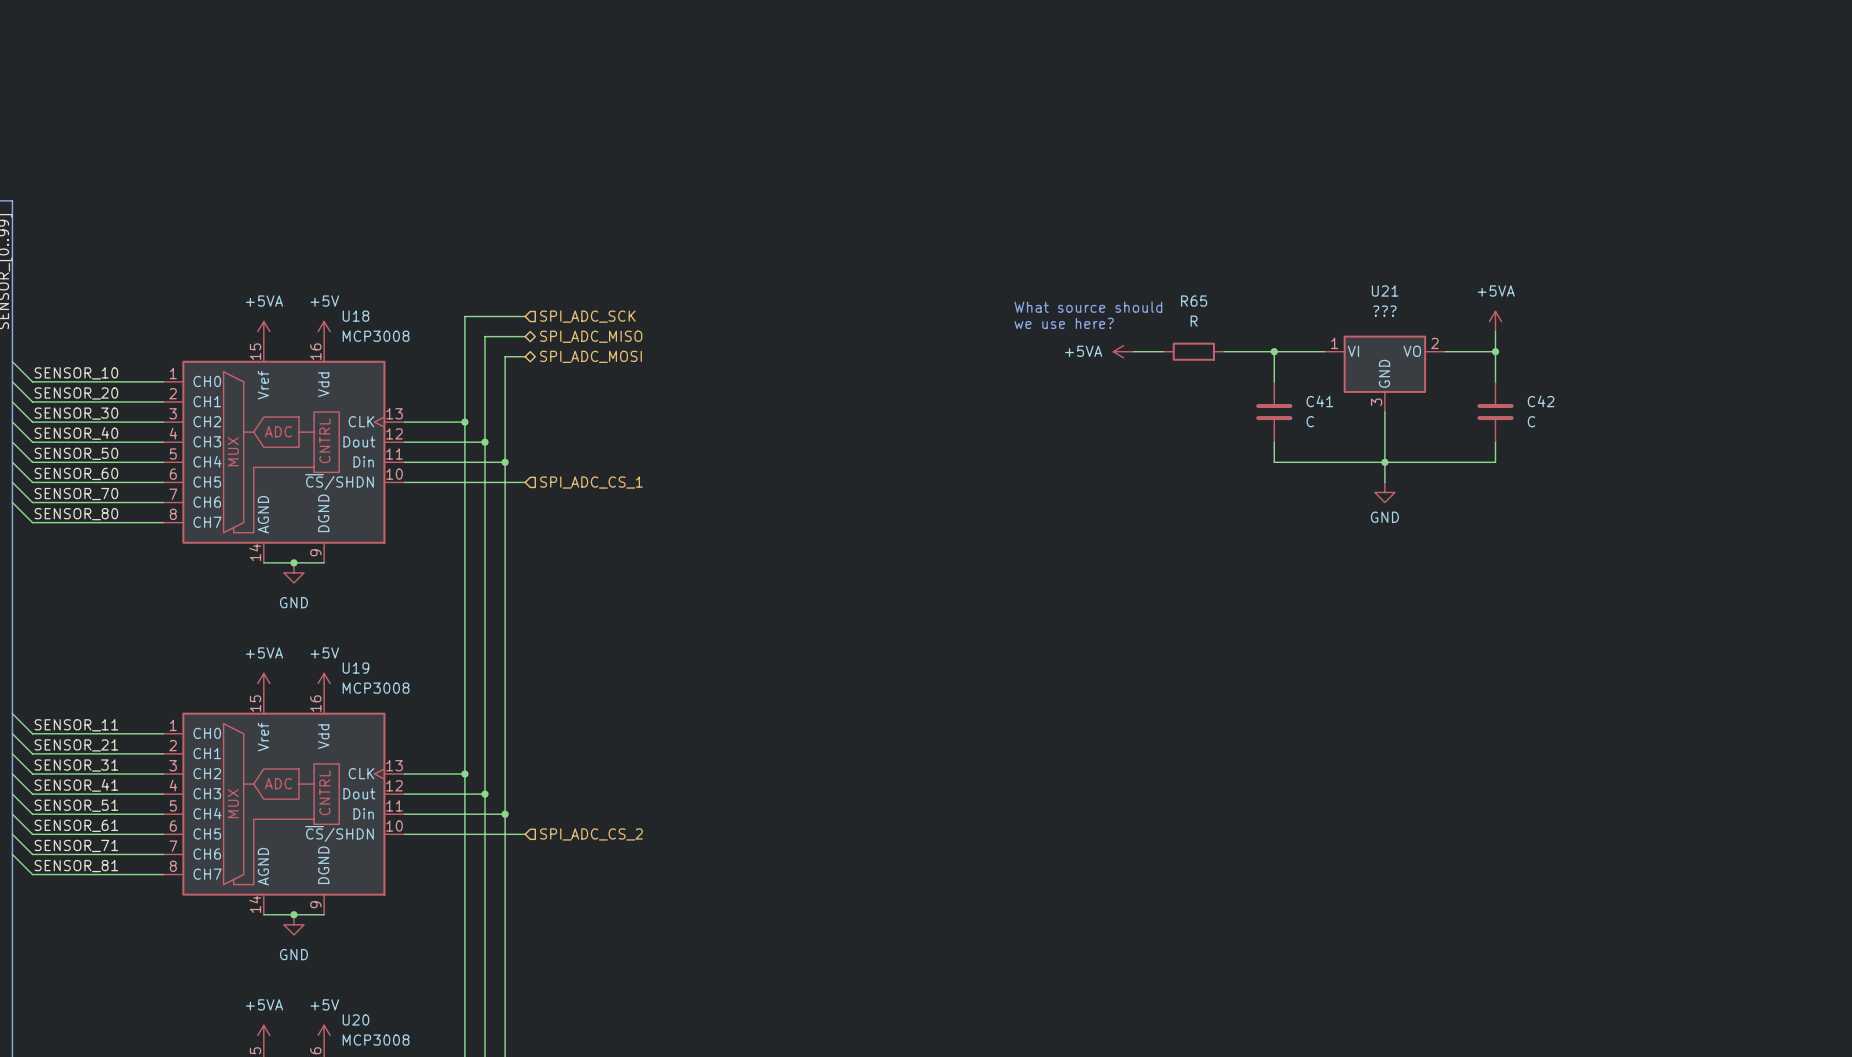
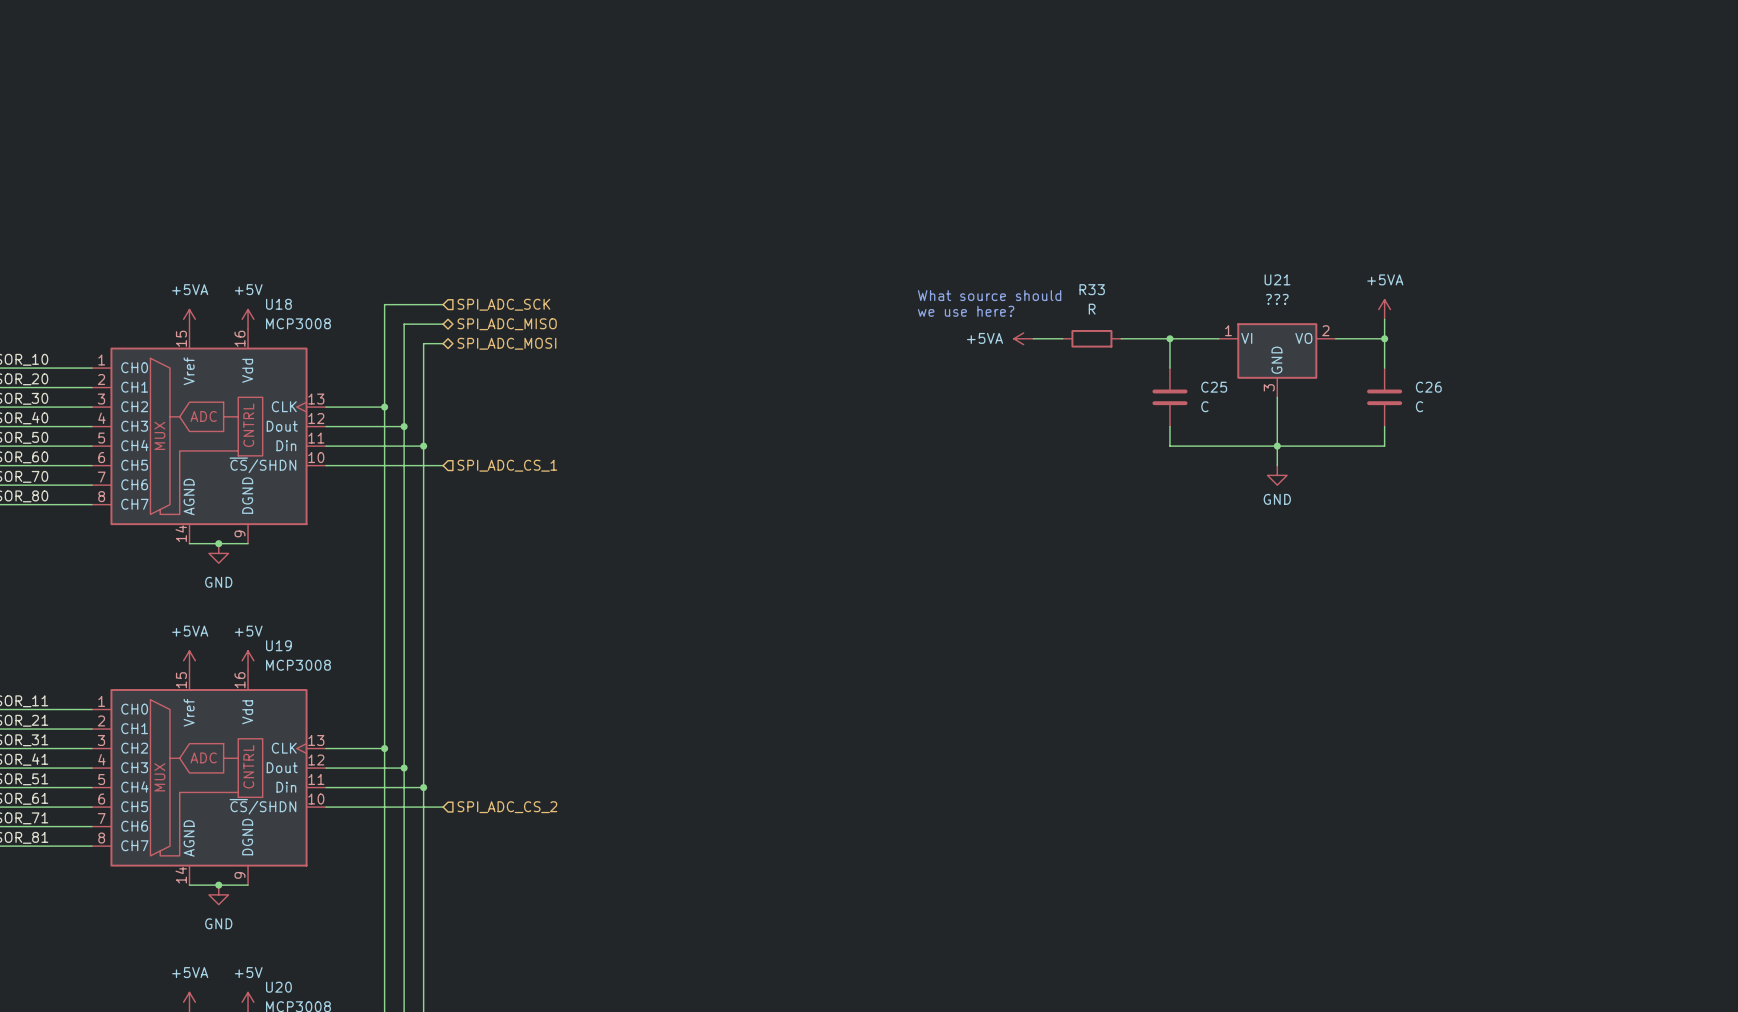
R65 name: R65 (1194, 301) -> R33 (1092, 289)
C41 name: C41 (1319, 401) -> C25 (1214, 387)
C42 name: C42 (1541, 401) -> C26 (1428, 387)

